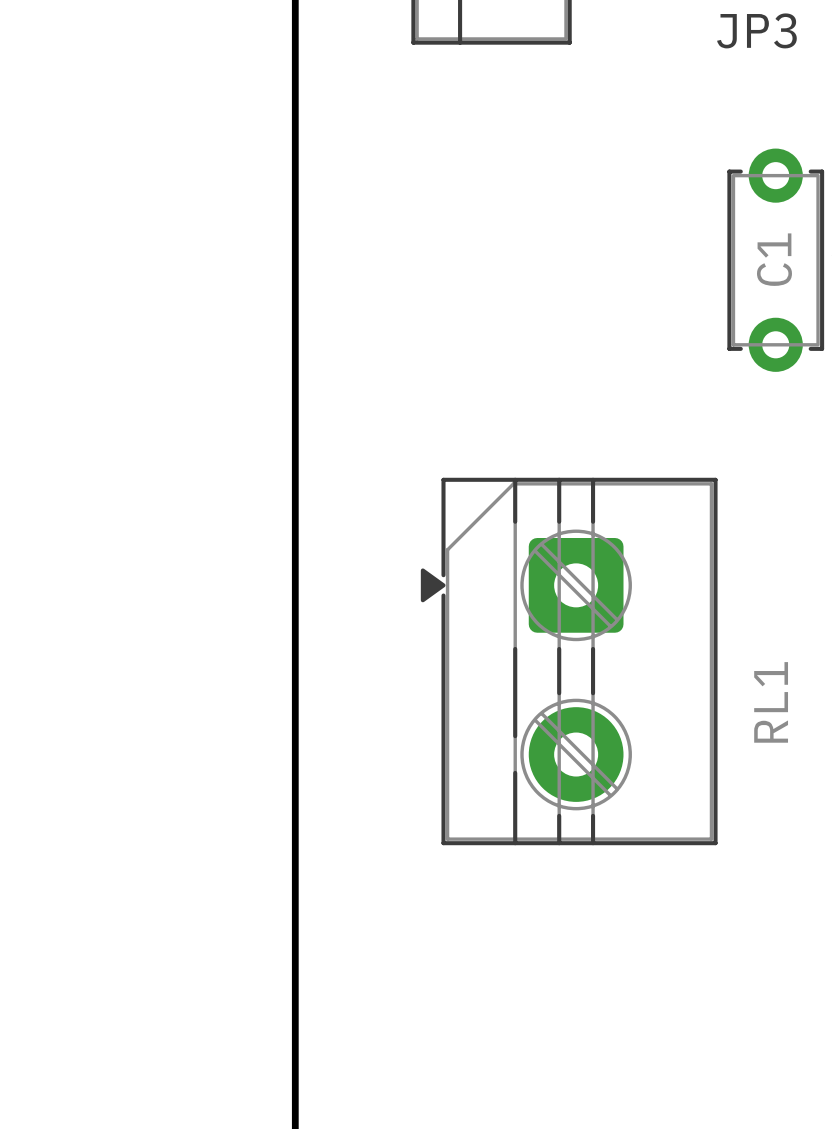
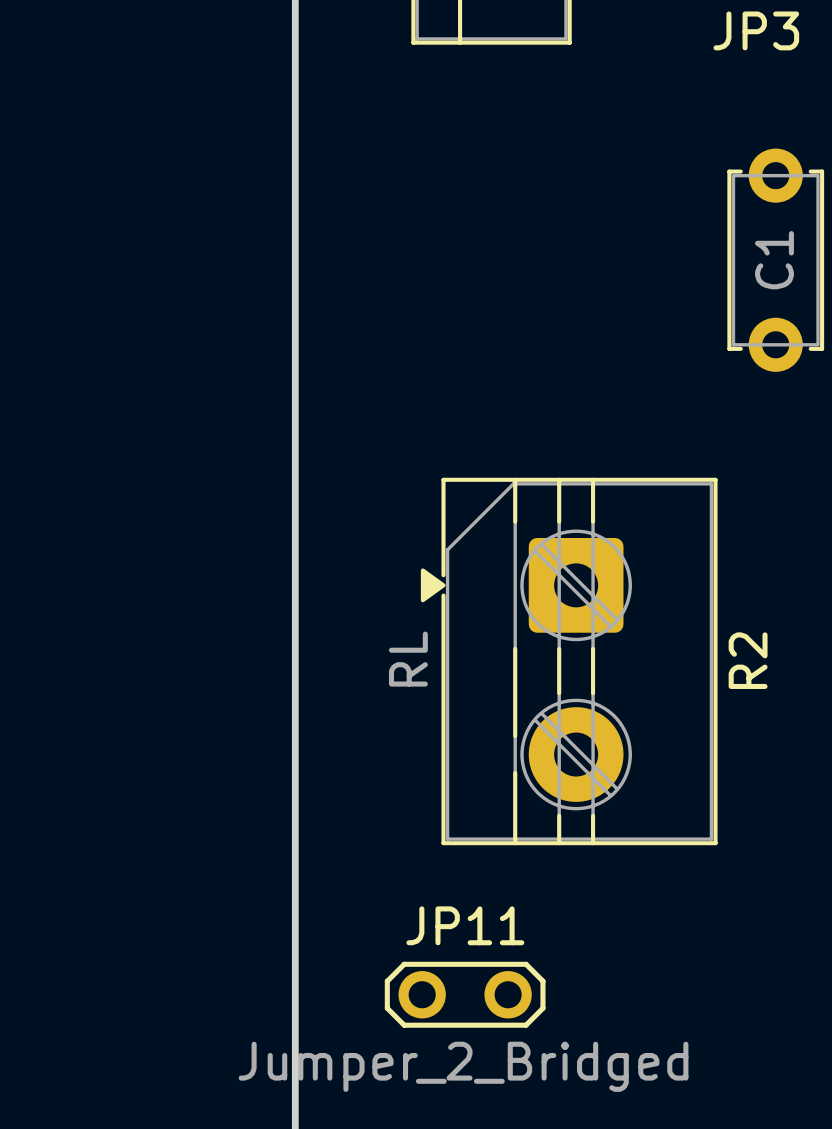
RL1 value: none -> RL (408, 659)
RL1 name: RL1 (771, 702) -> R2 (748, 660)
JP11: none -> Jumper_2_Bridged (465, 994)

